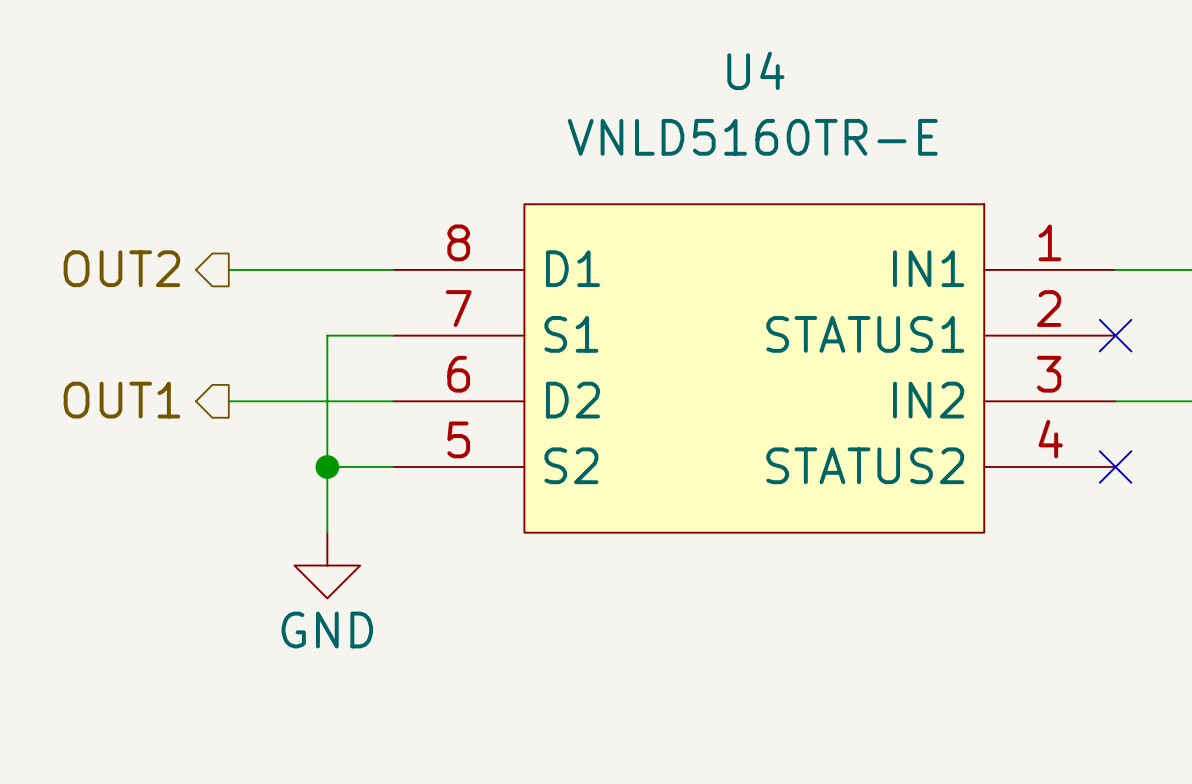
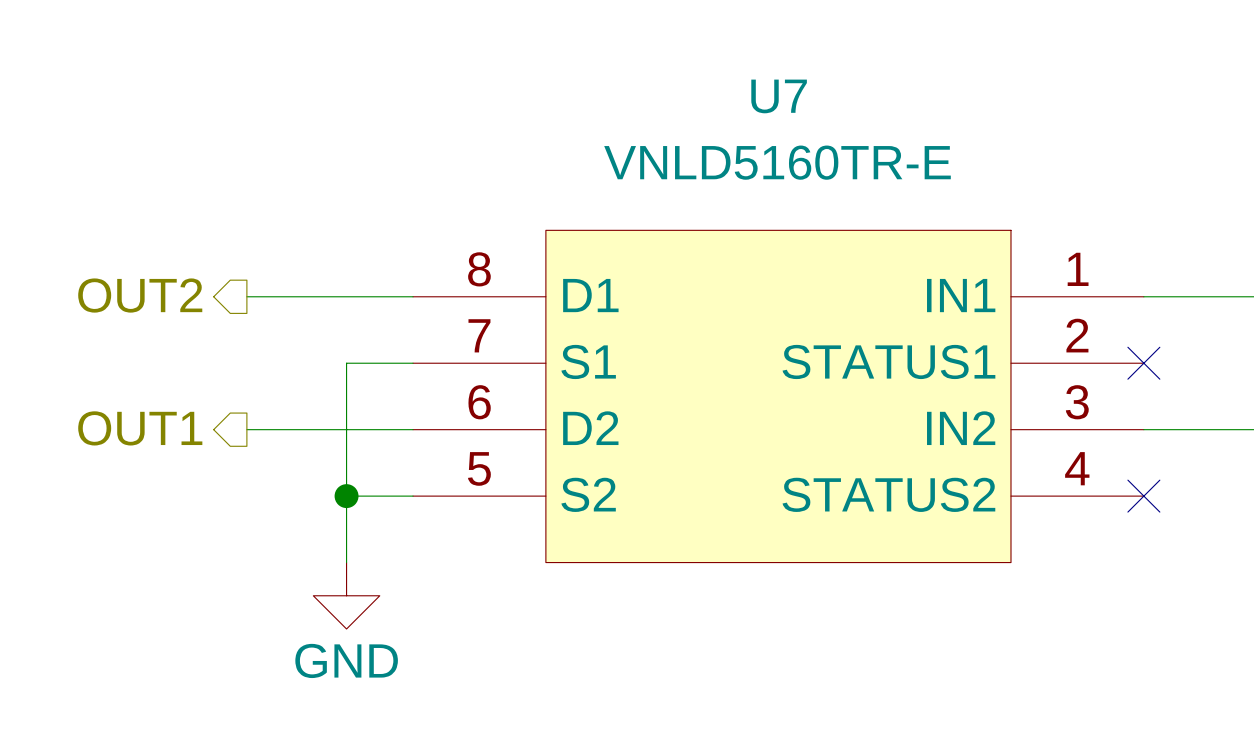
U4 name: U4 (755, 70) -> U7 (779, 96)

